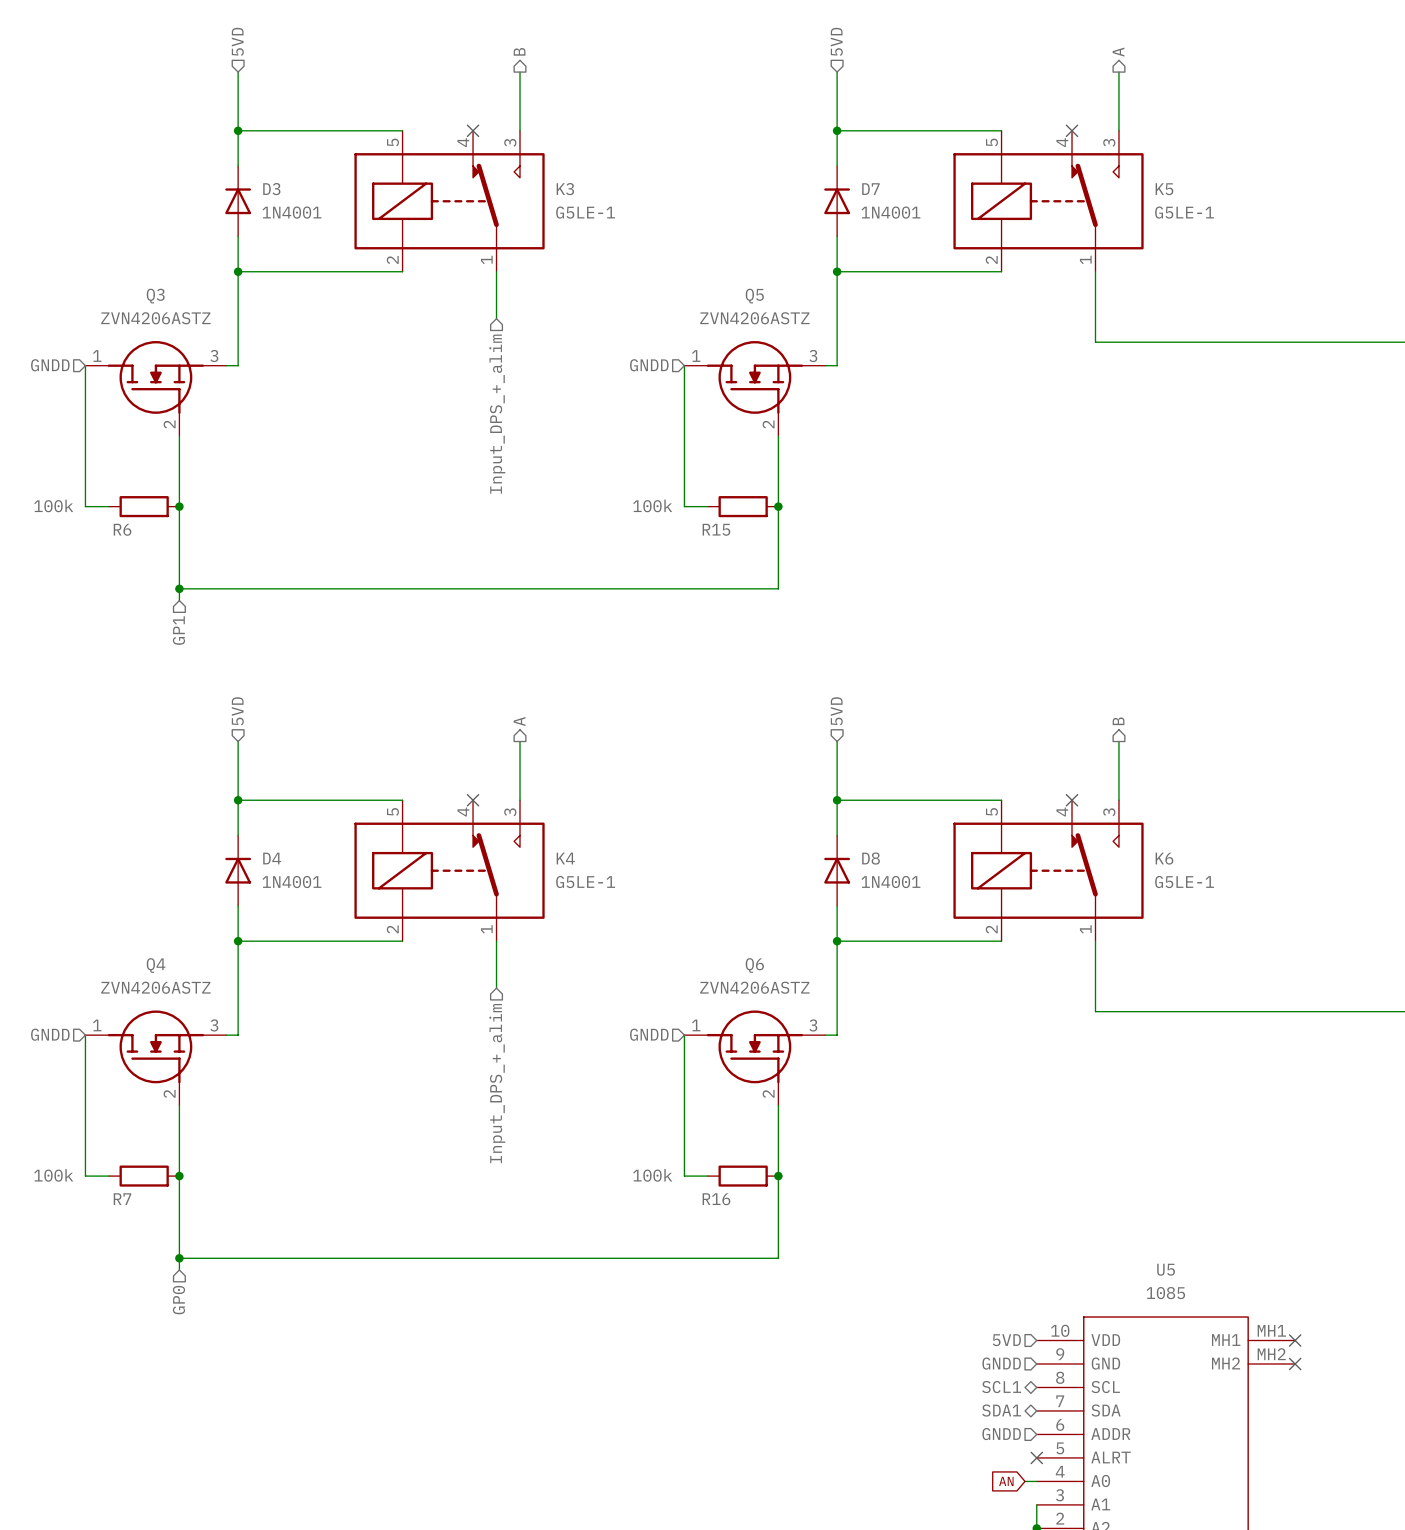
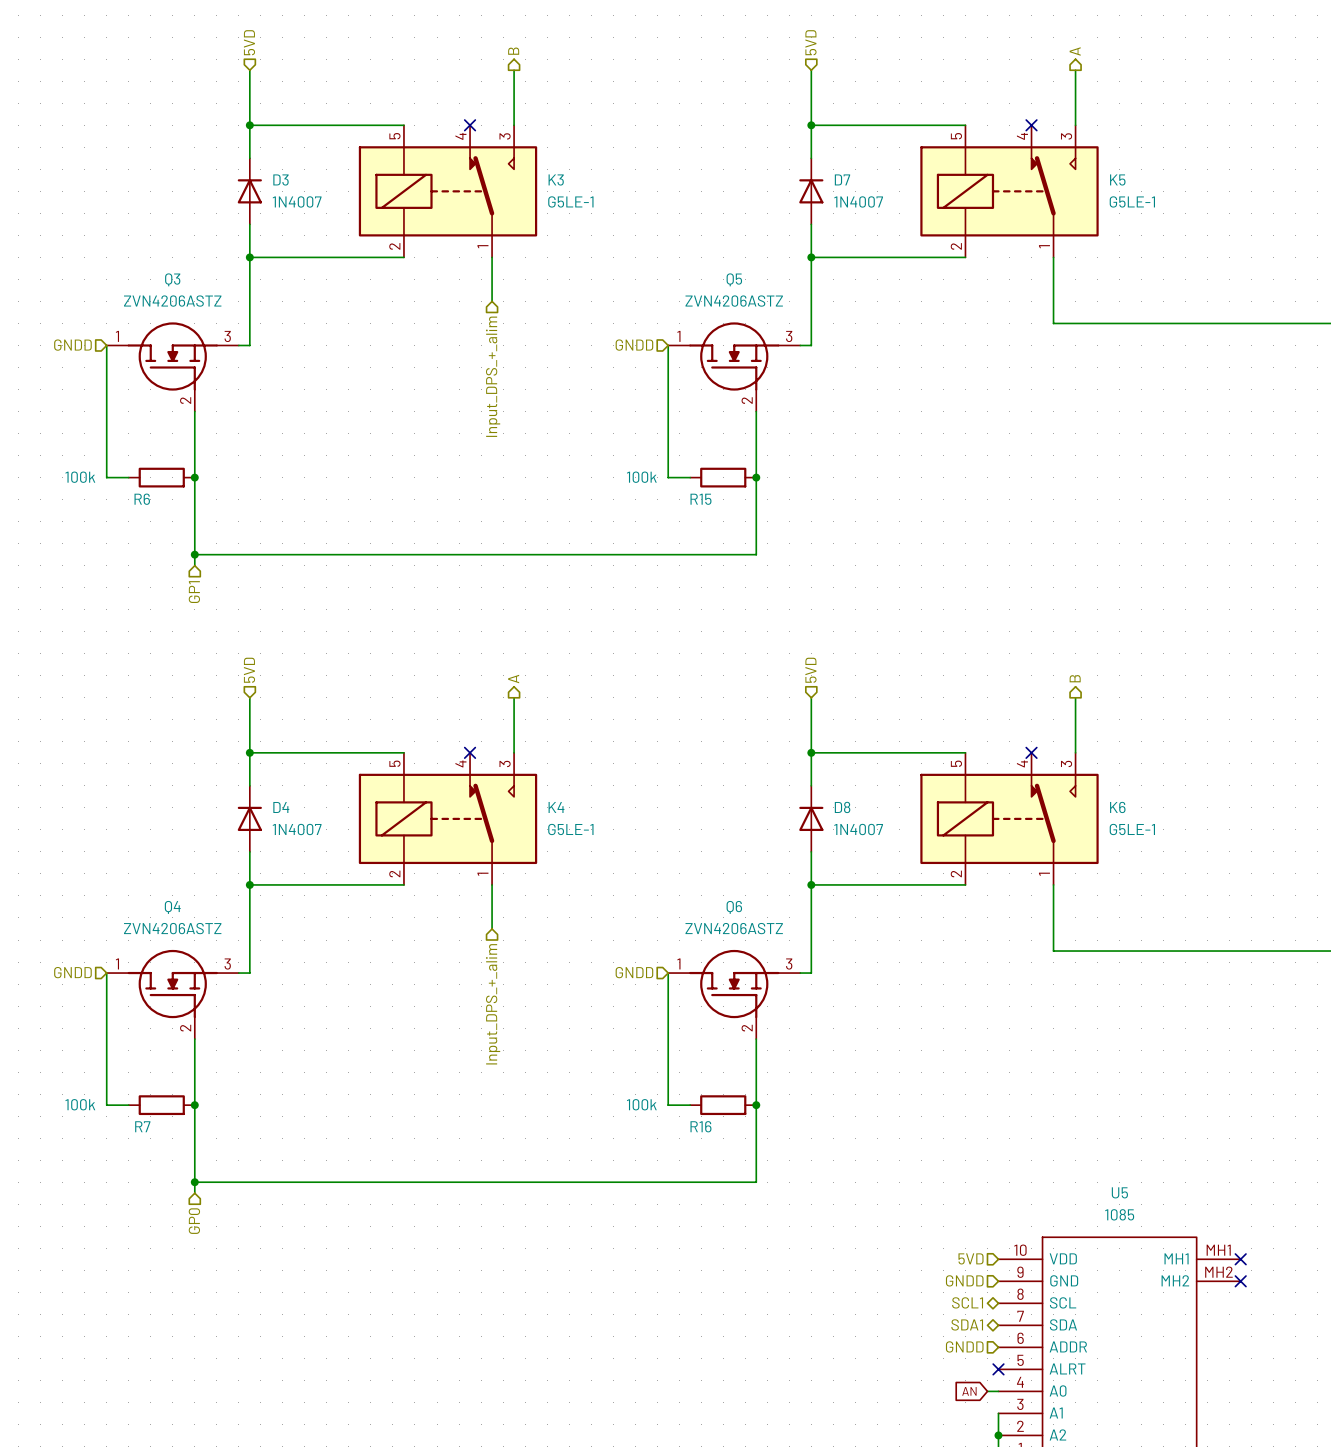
D3 value: 1N4001 (291, 212) -> 1N4007 (297, 201)
D7 value: 1N4001 (890, 212) -> 1N4007 (858, 201)
D4 value: 1N4001 (291, 882) -> 1N4007 (297, 829)
D8 value: 1N4001 (890, 882) -> 1N4007 (858, 829)

